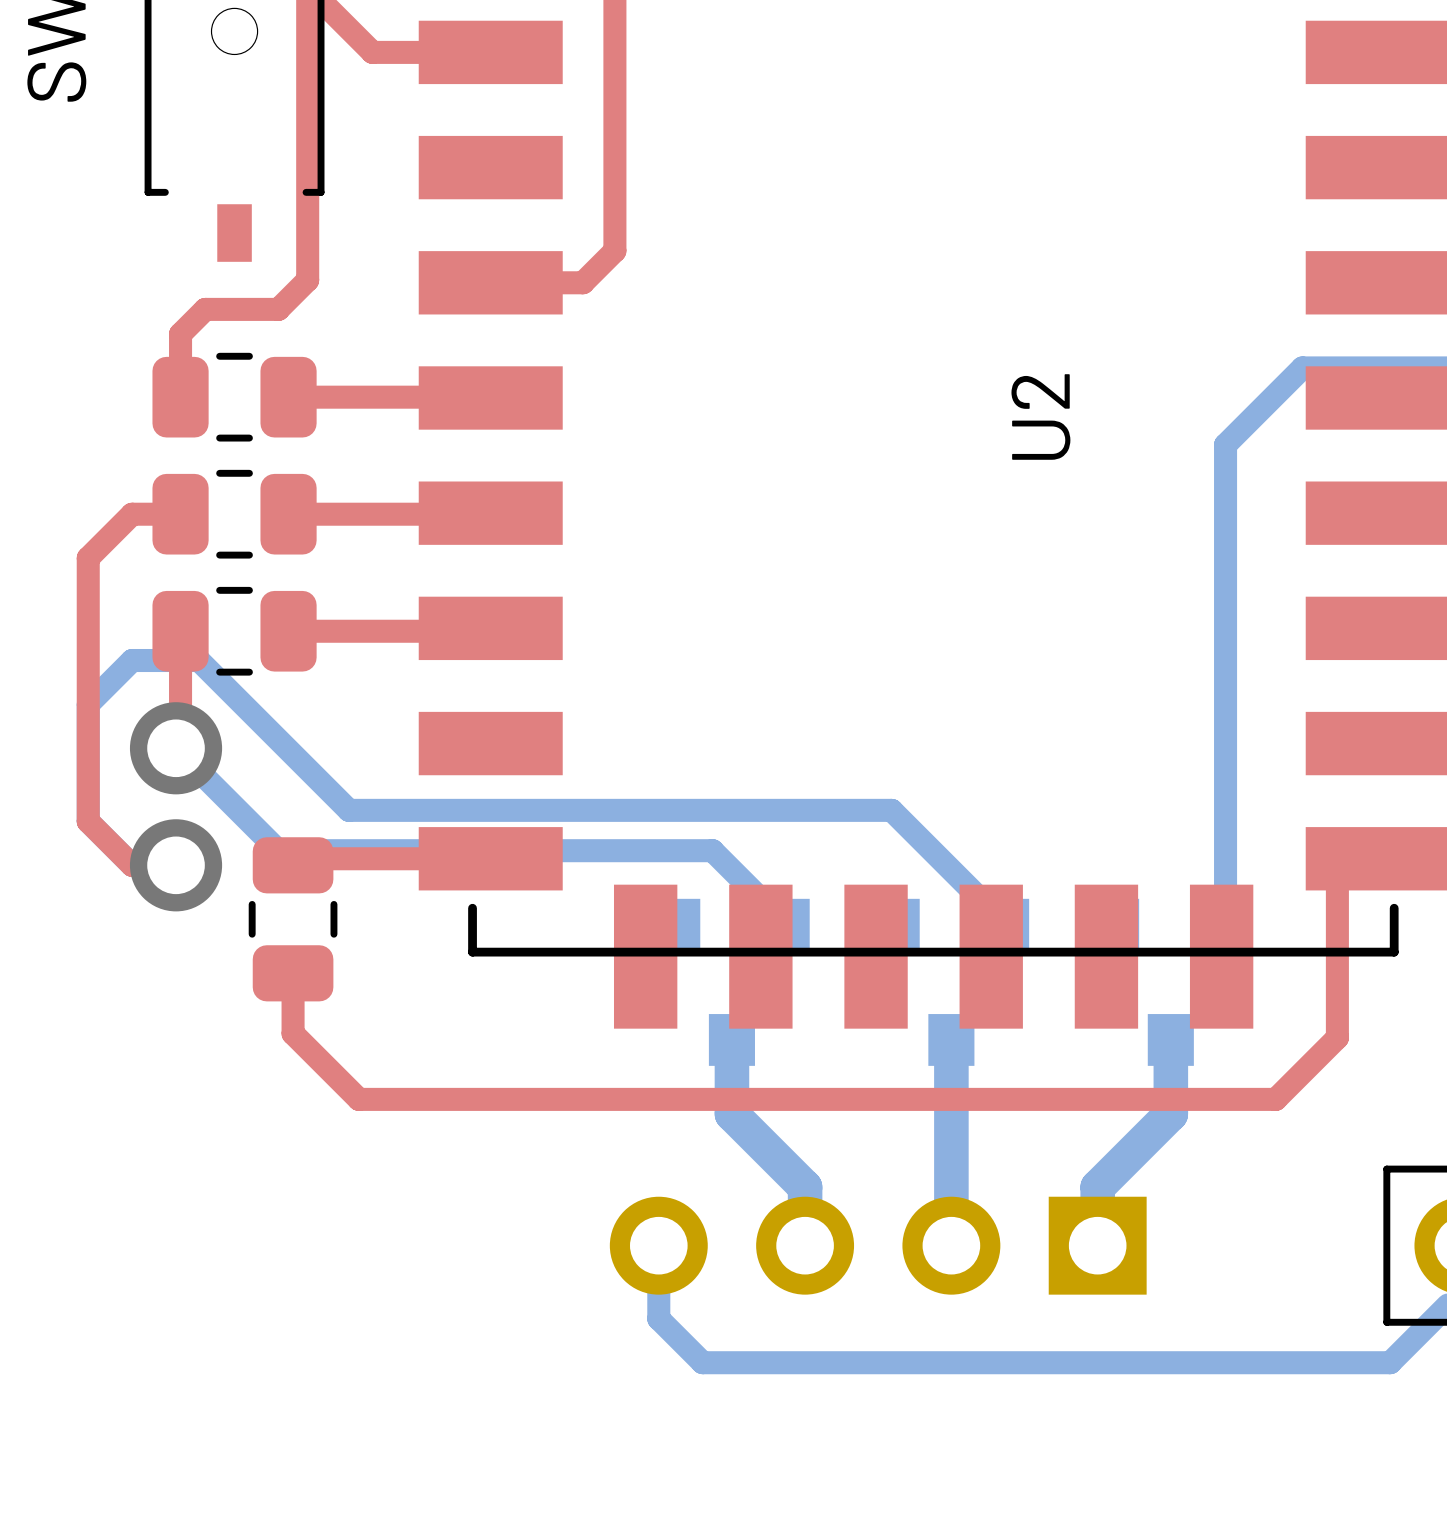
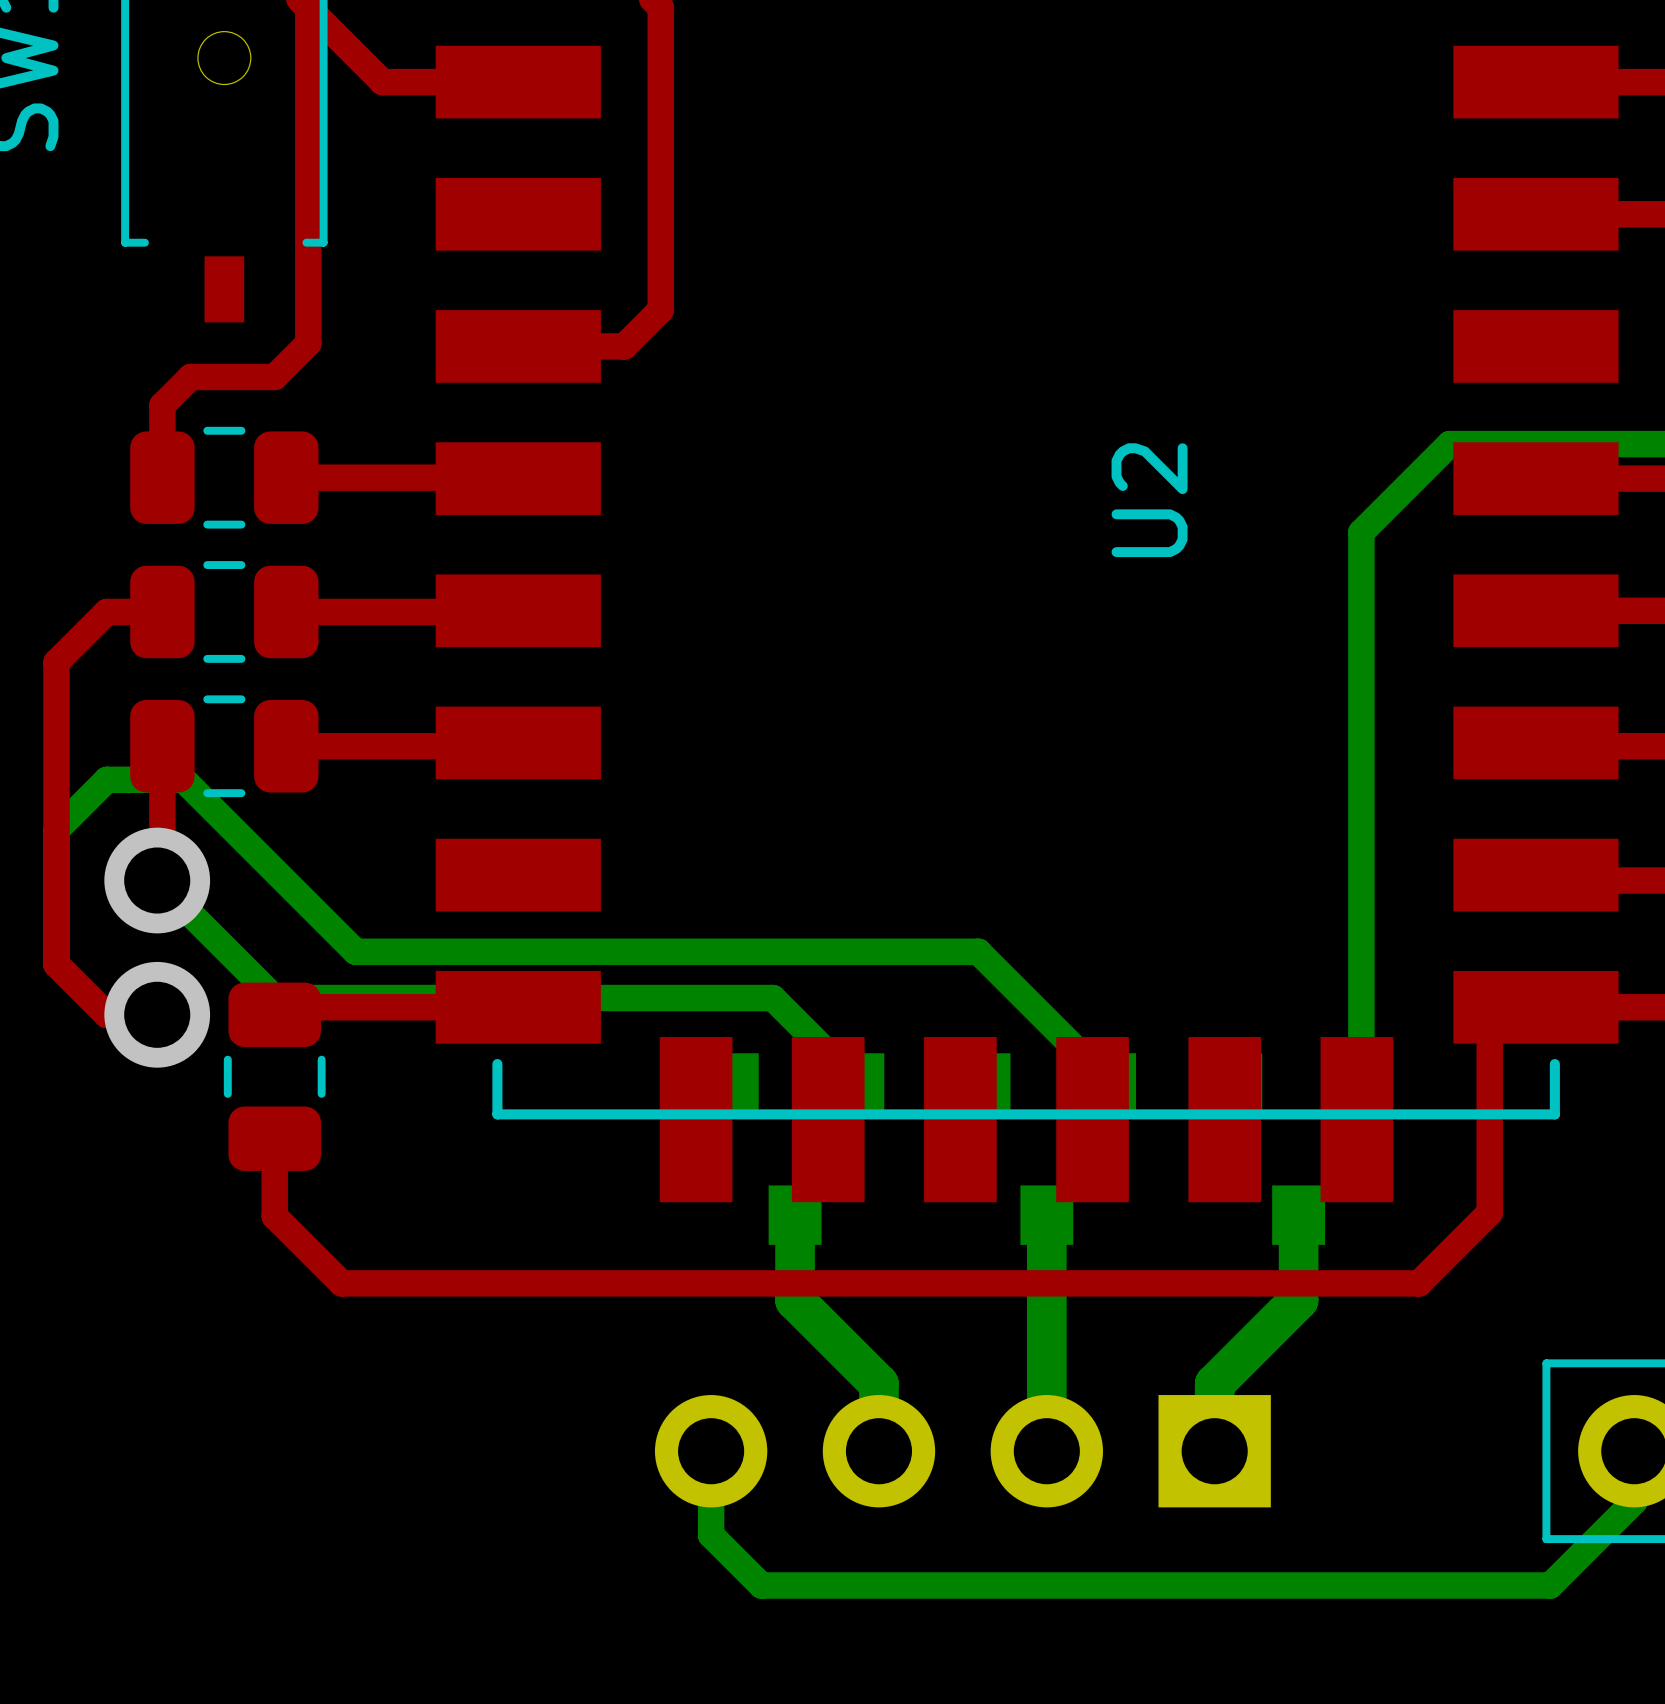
part position: (293, 919) -> (274, 1076)
top track: (293, 973) (293, 1033) (358, 1099) -> (274, 1138) (274, 1216) (341, 1283) (367, 1283)

